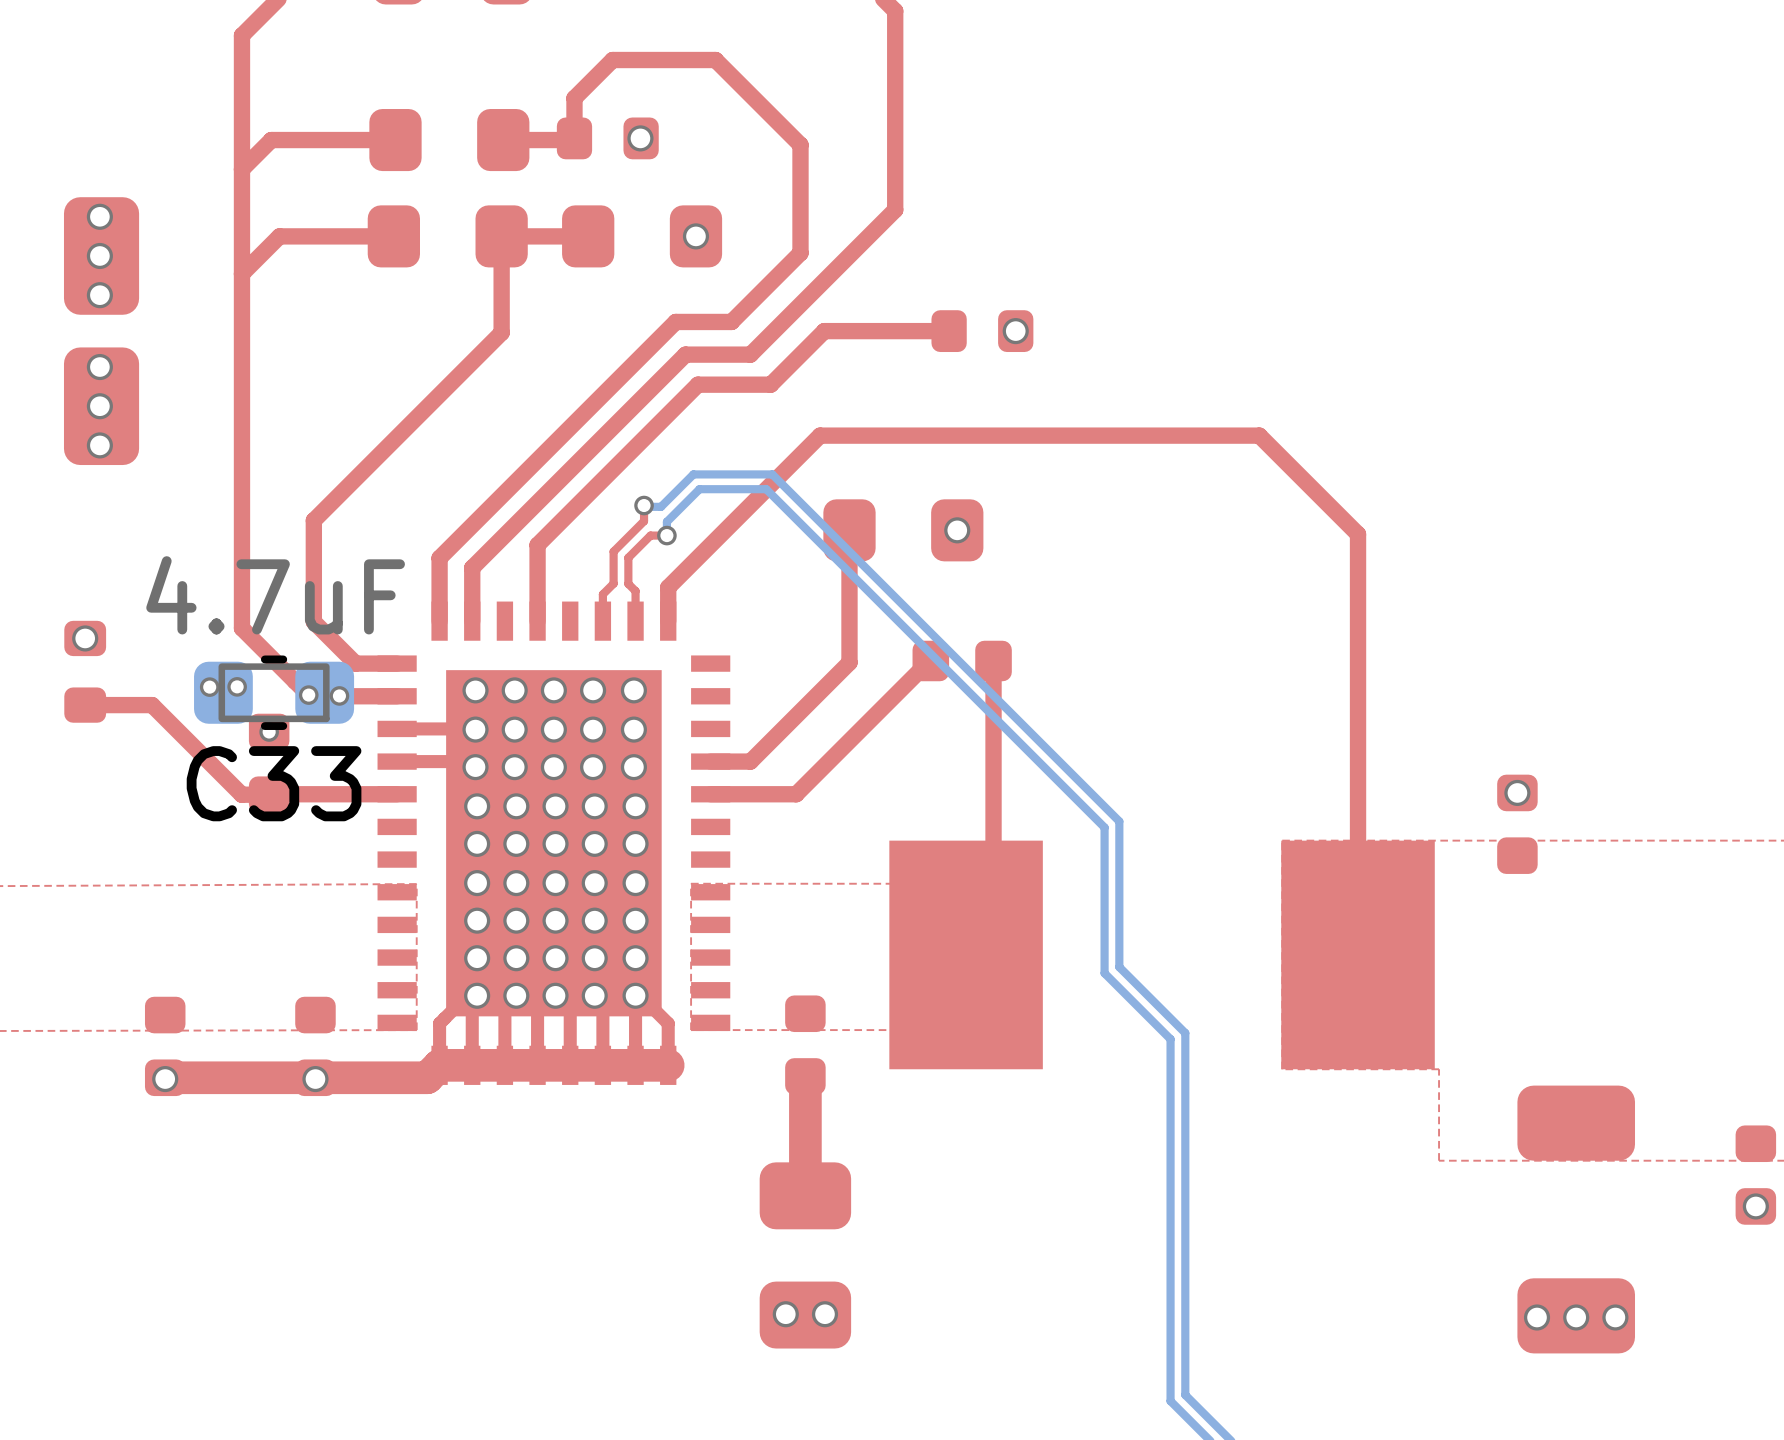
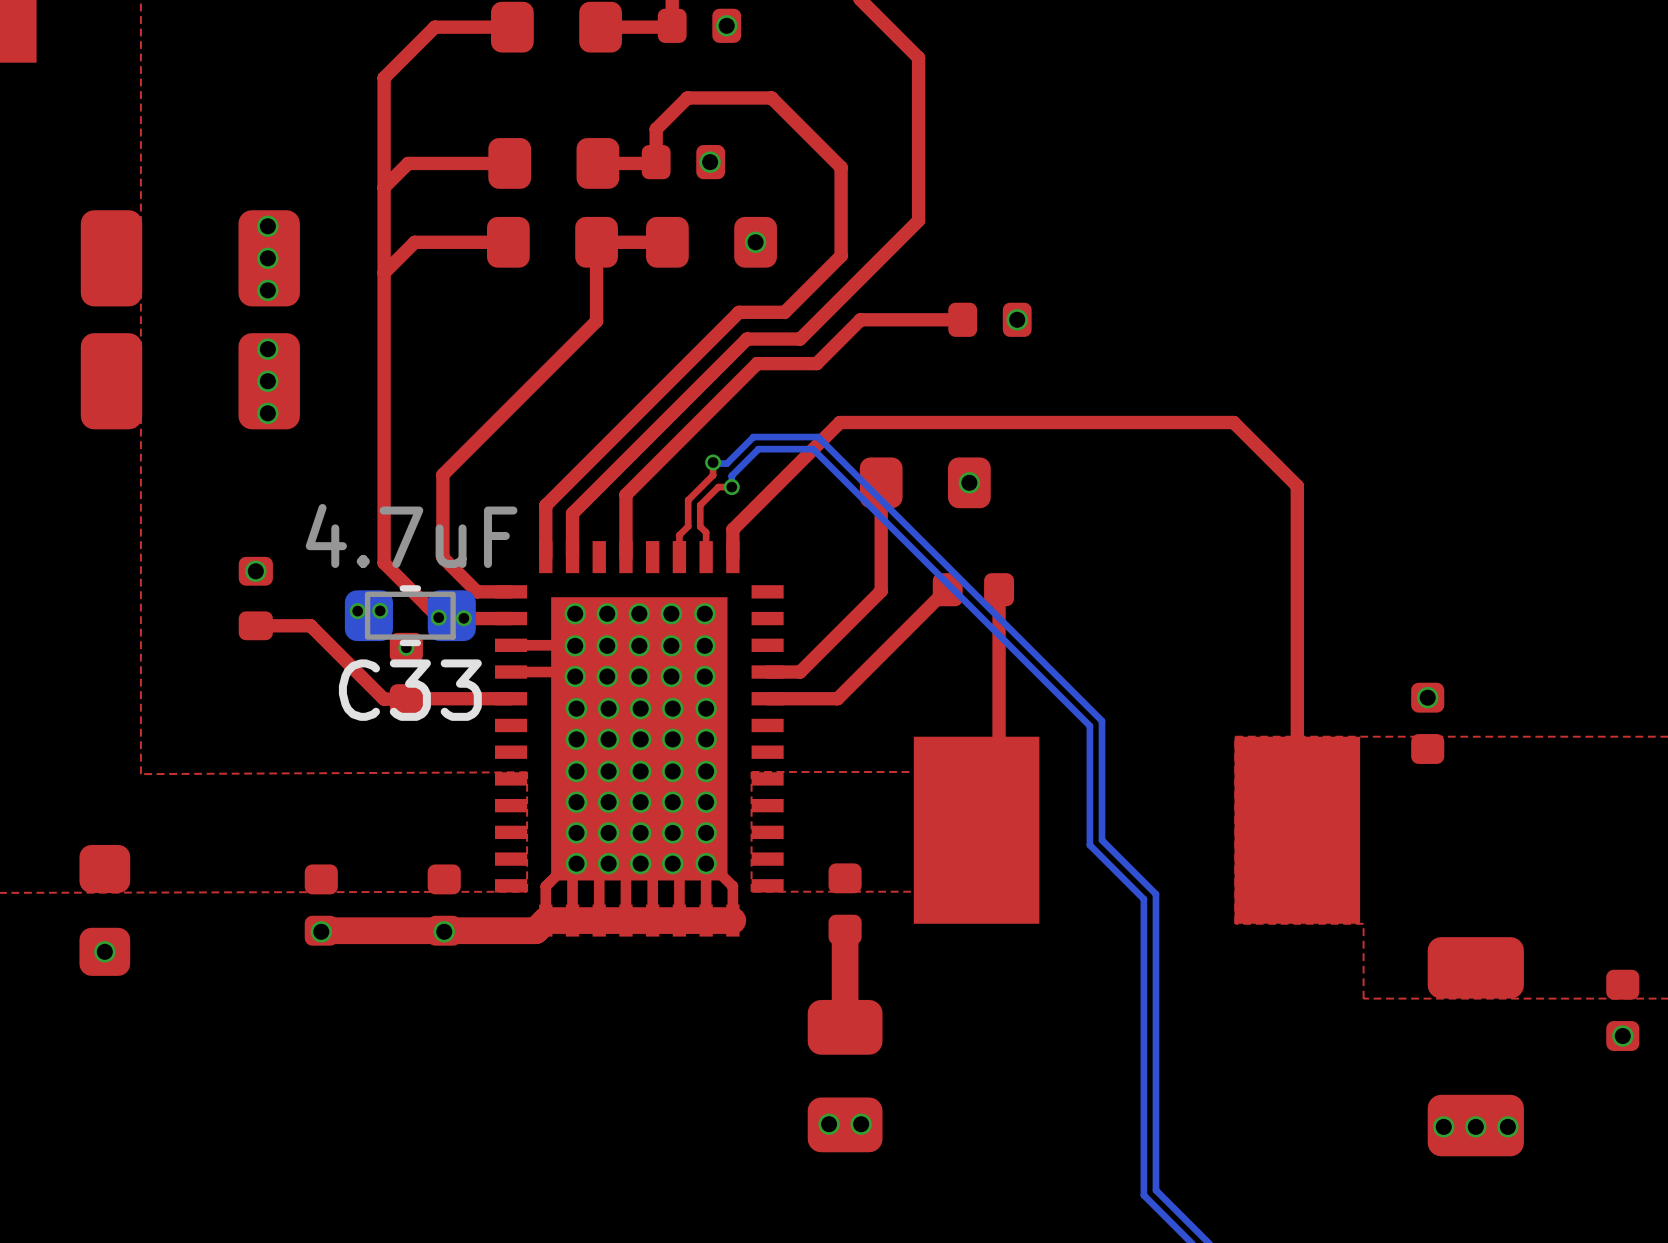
top track: (1280, 456) (1259, 435) (820, 435) (799, 456) -> (1233, 422) (839, 422)

